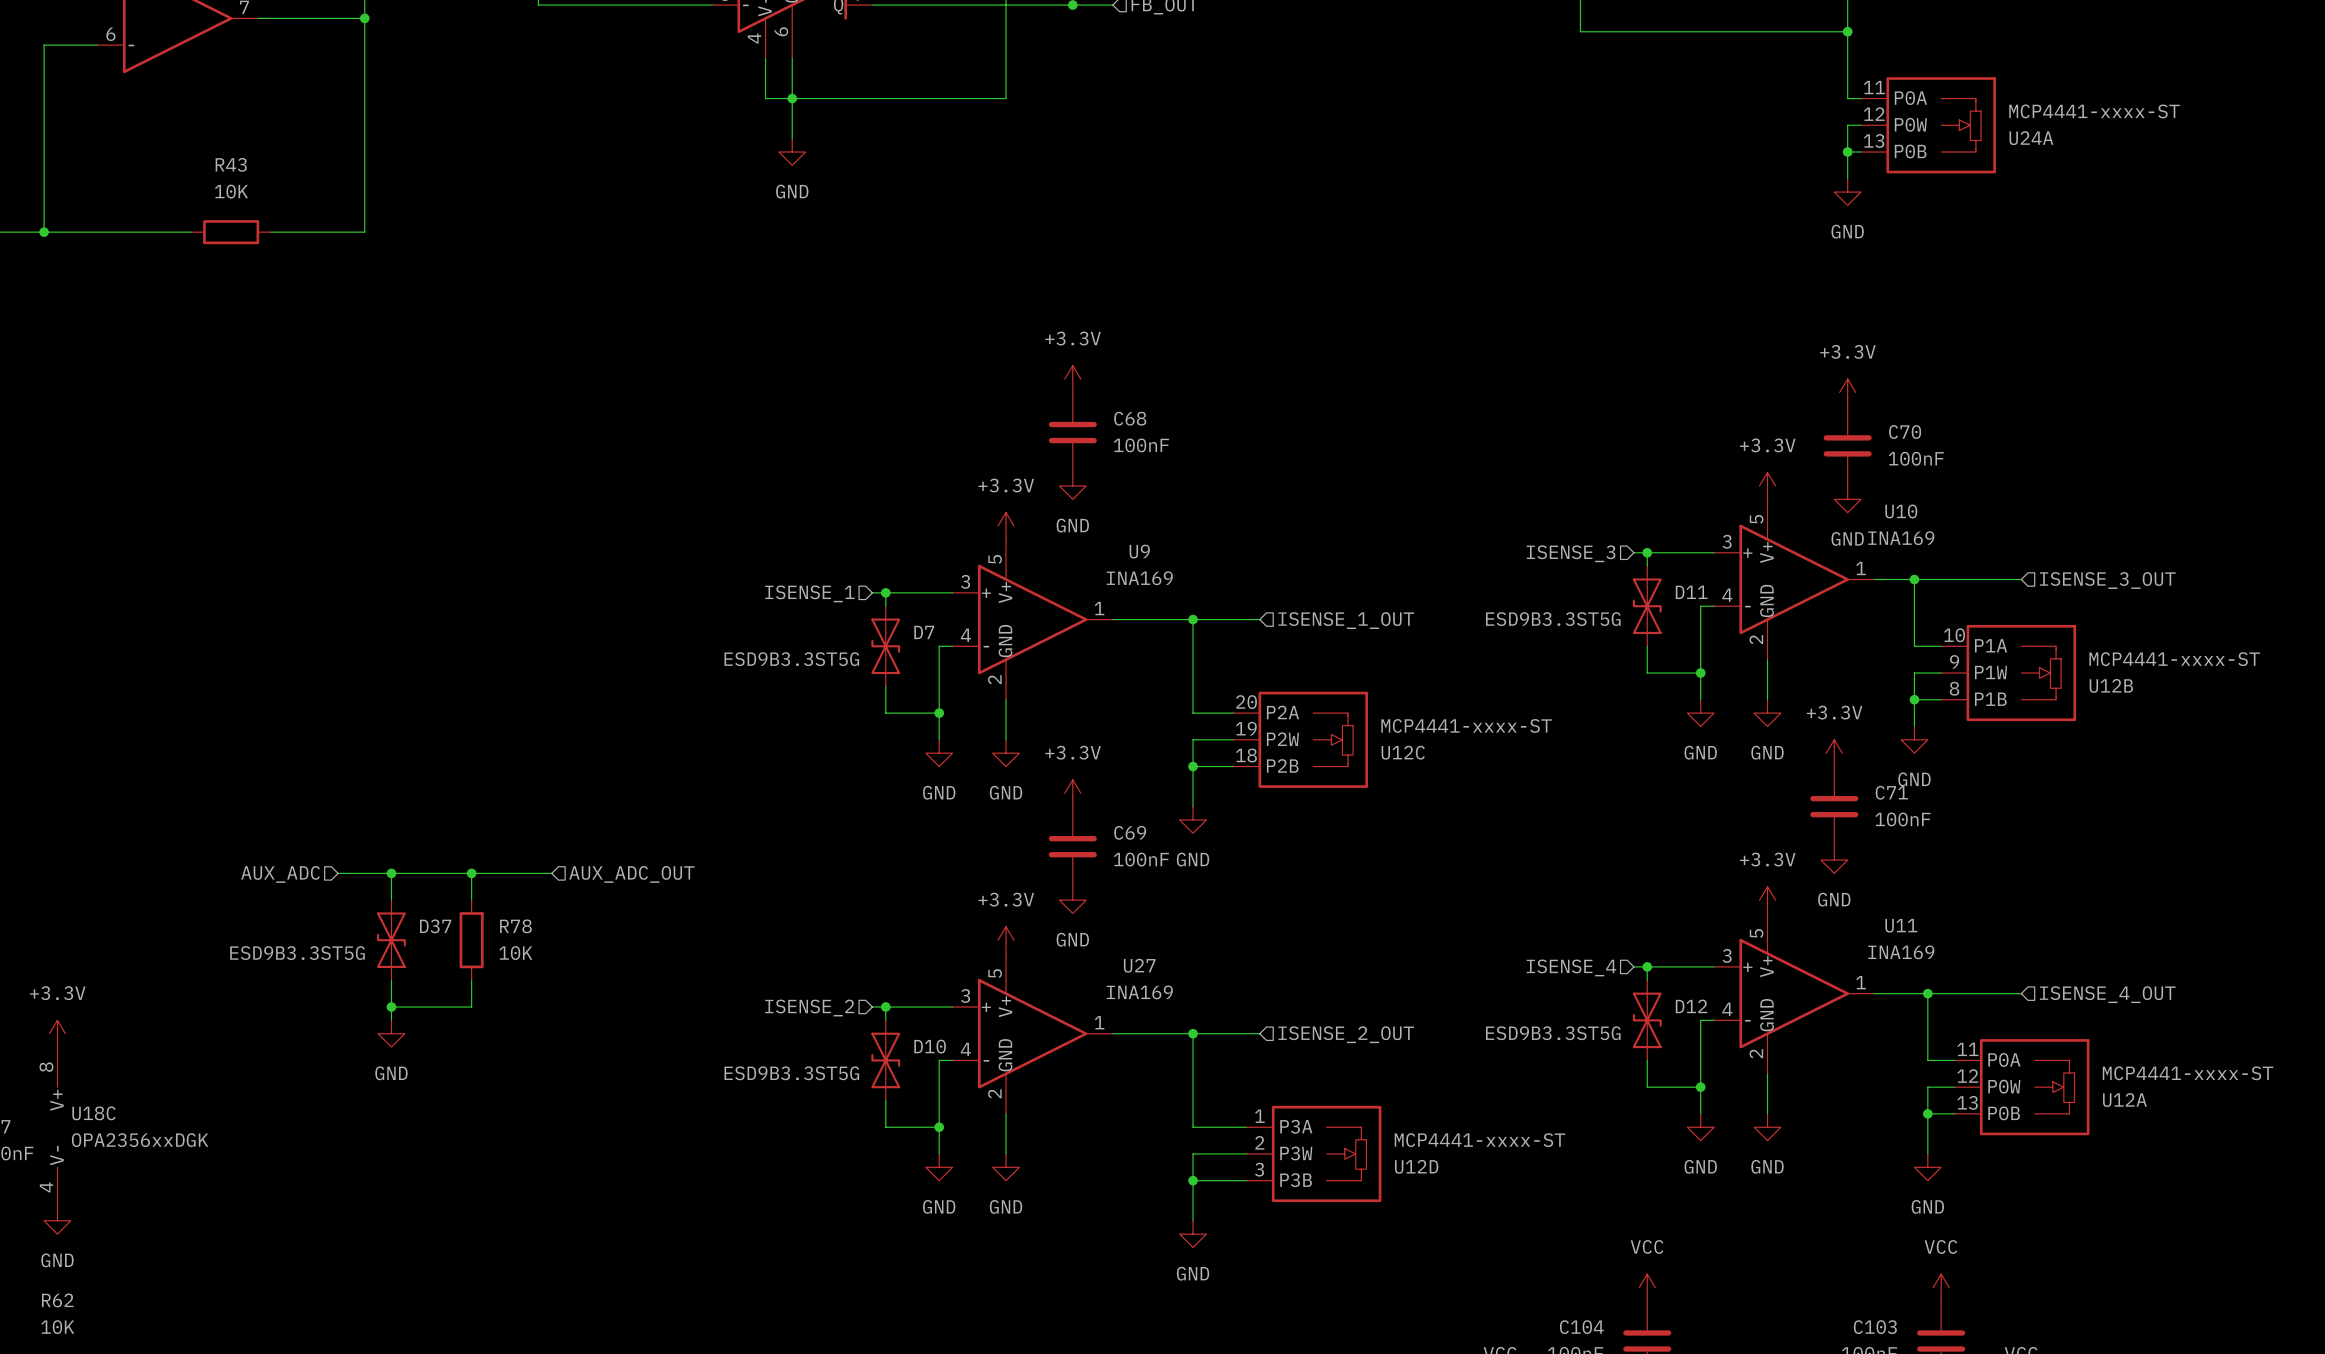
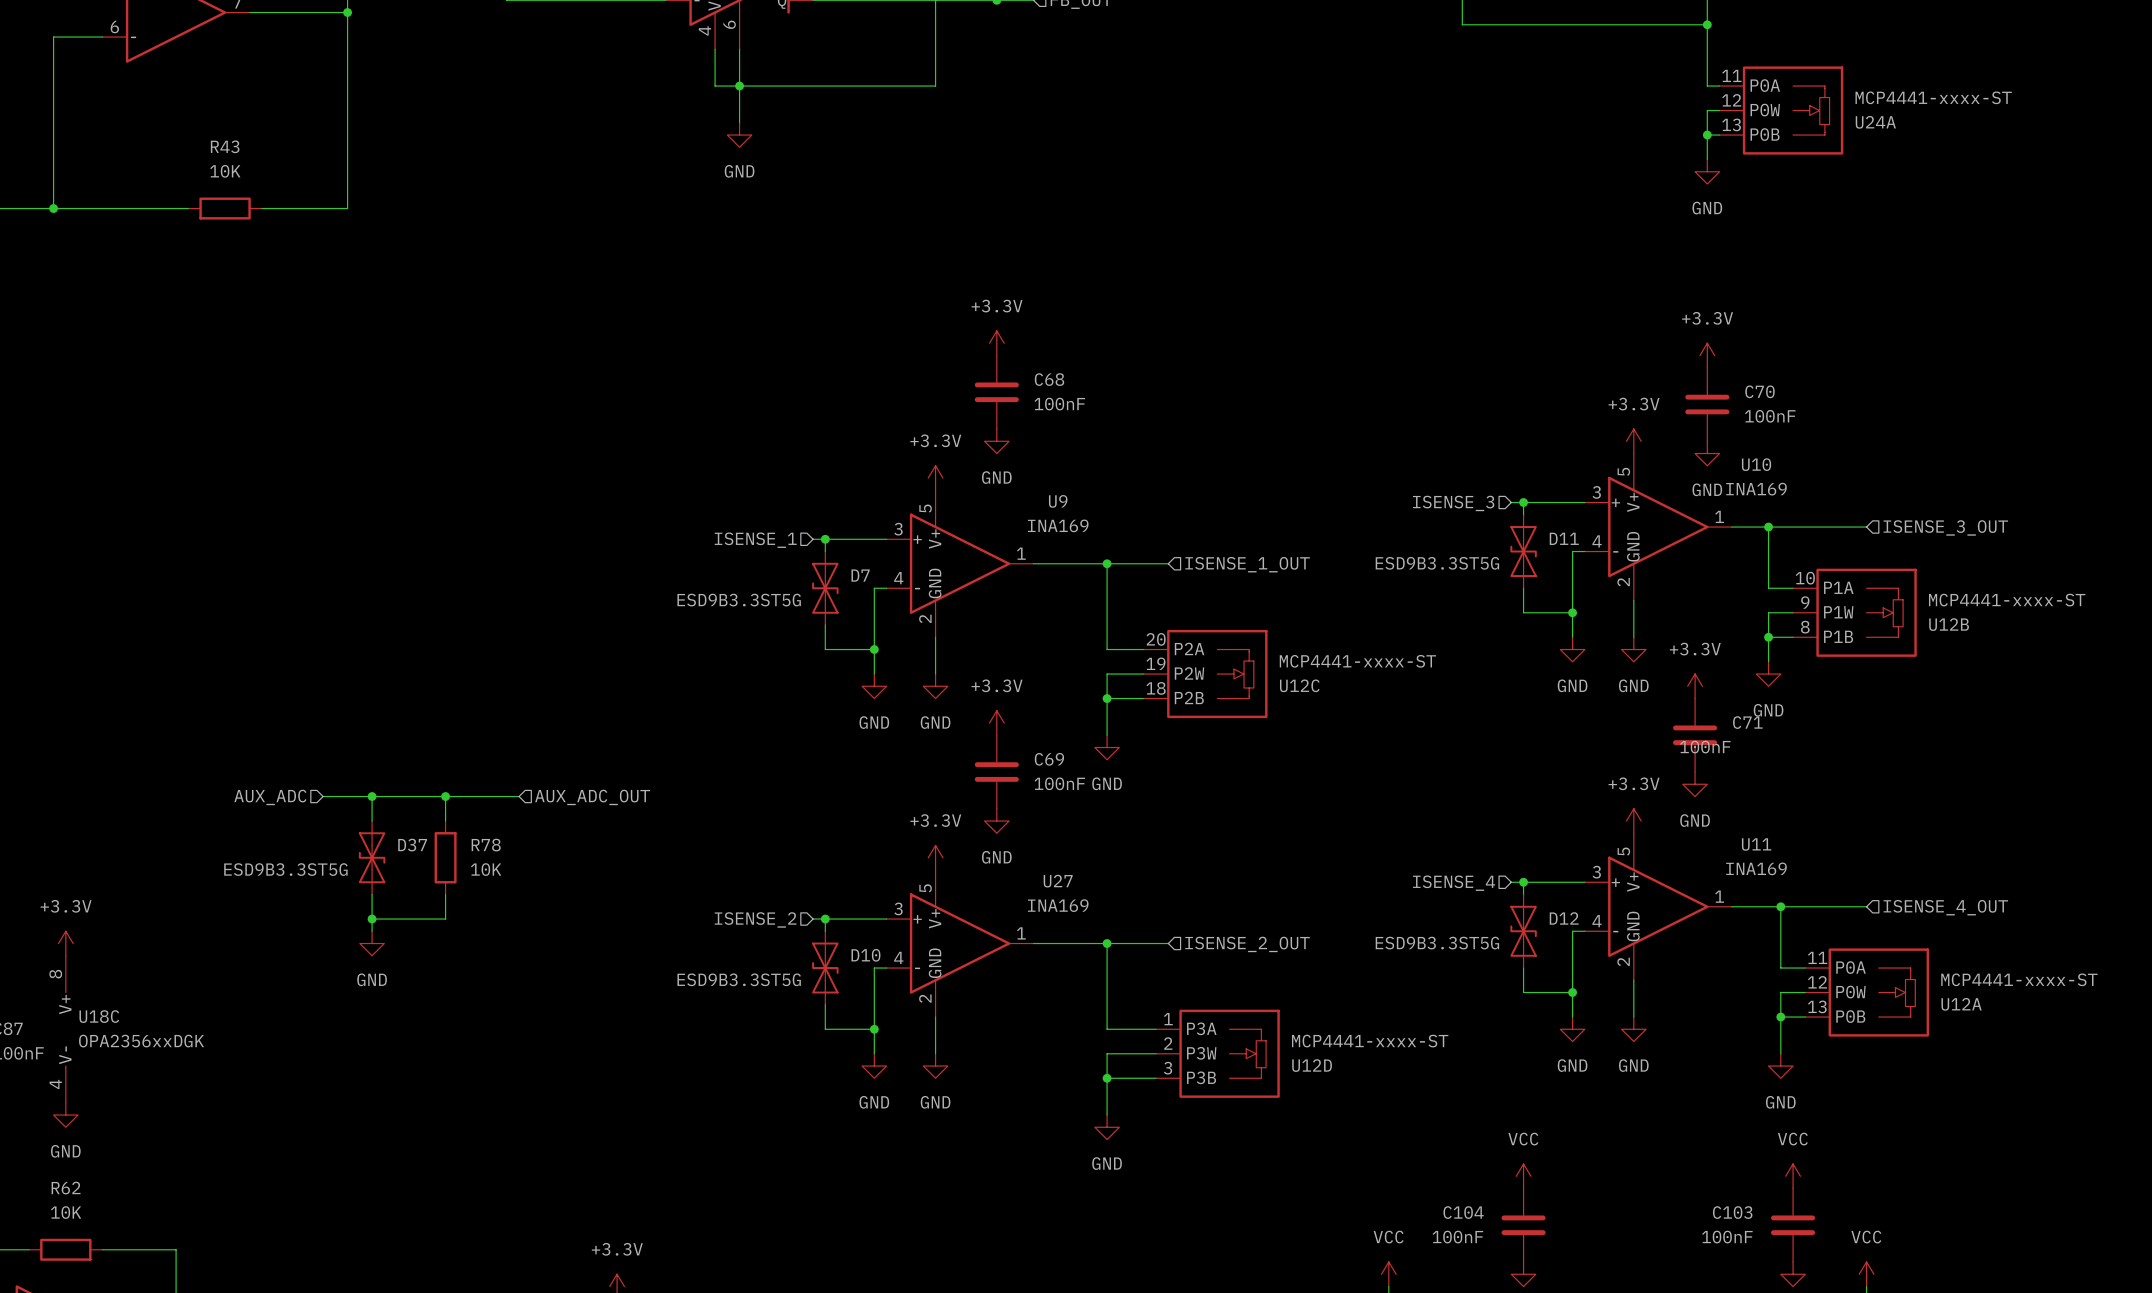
C71 value position: 100nF (1902, 819) -> 100nF (1705, 747)

